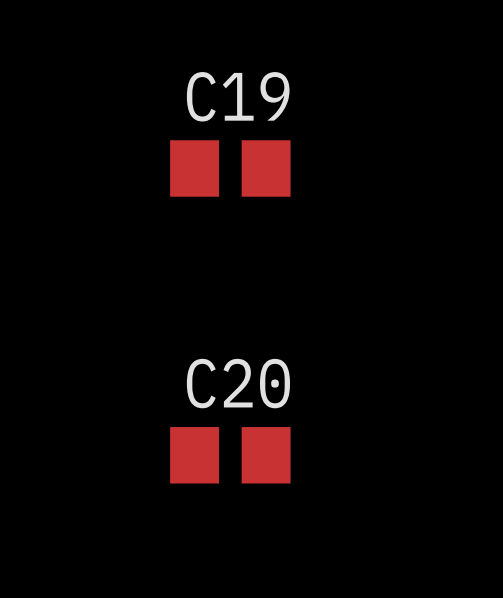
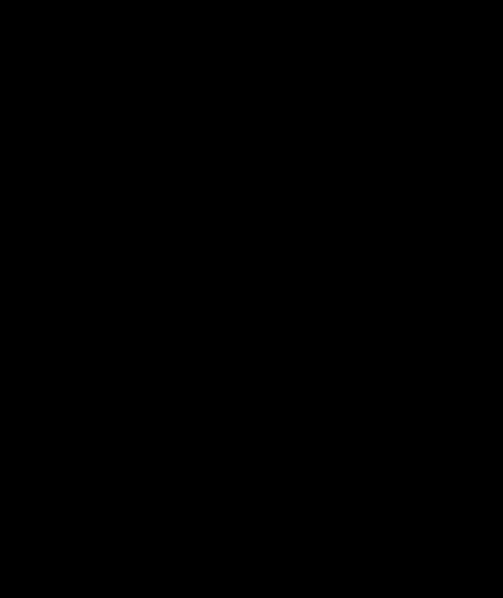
C19: (230, 168) -> none
C20: (230, 455) -> none

